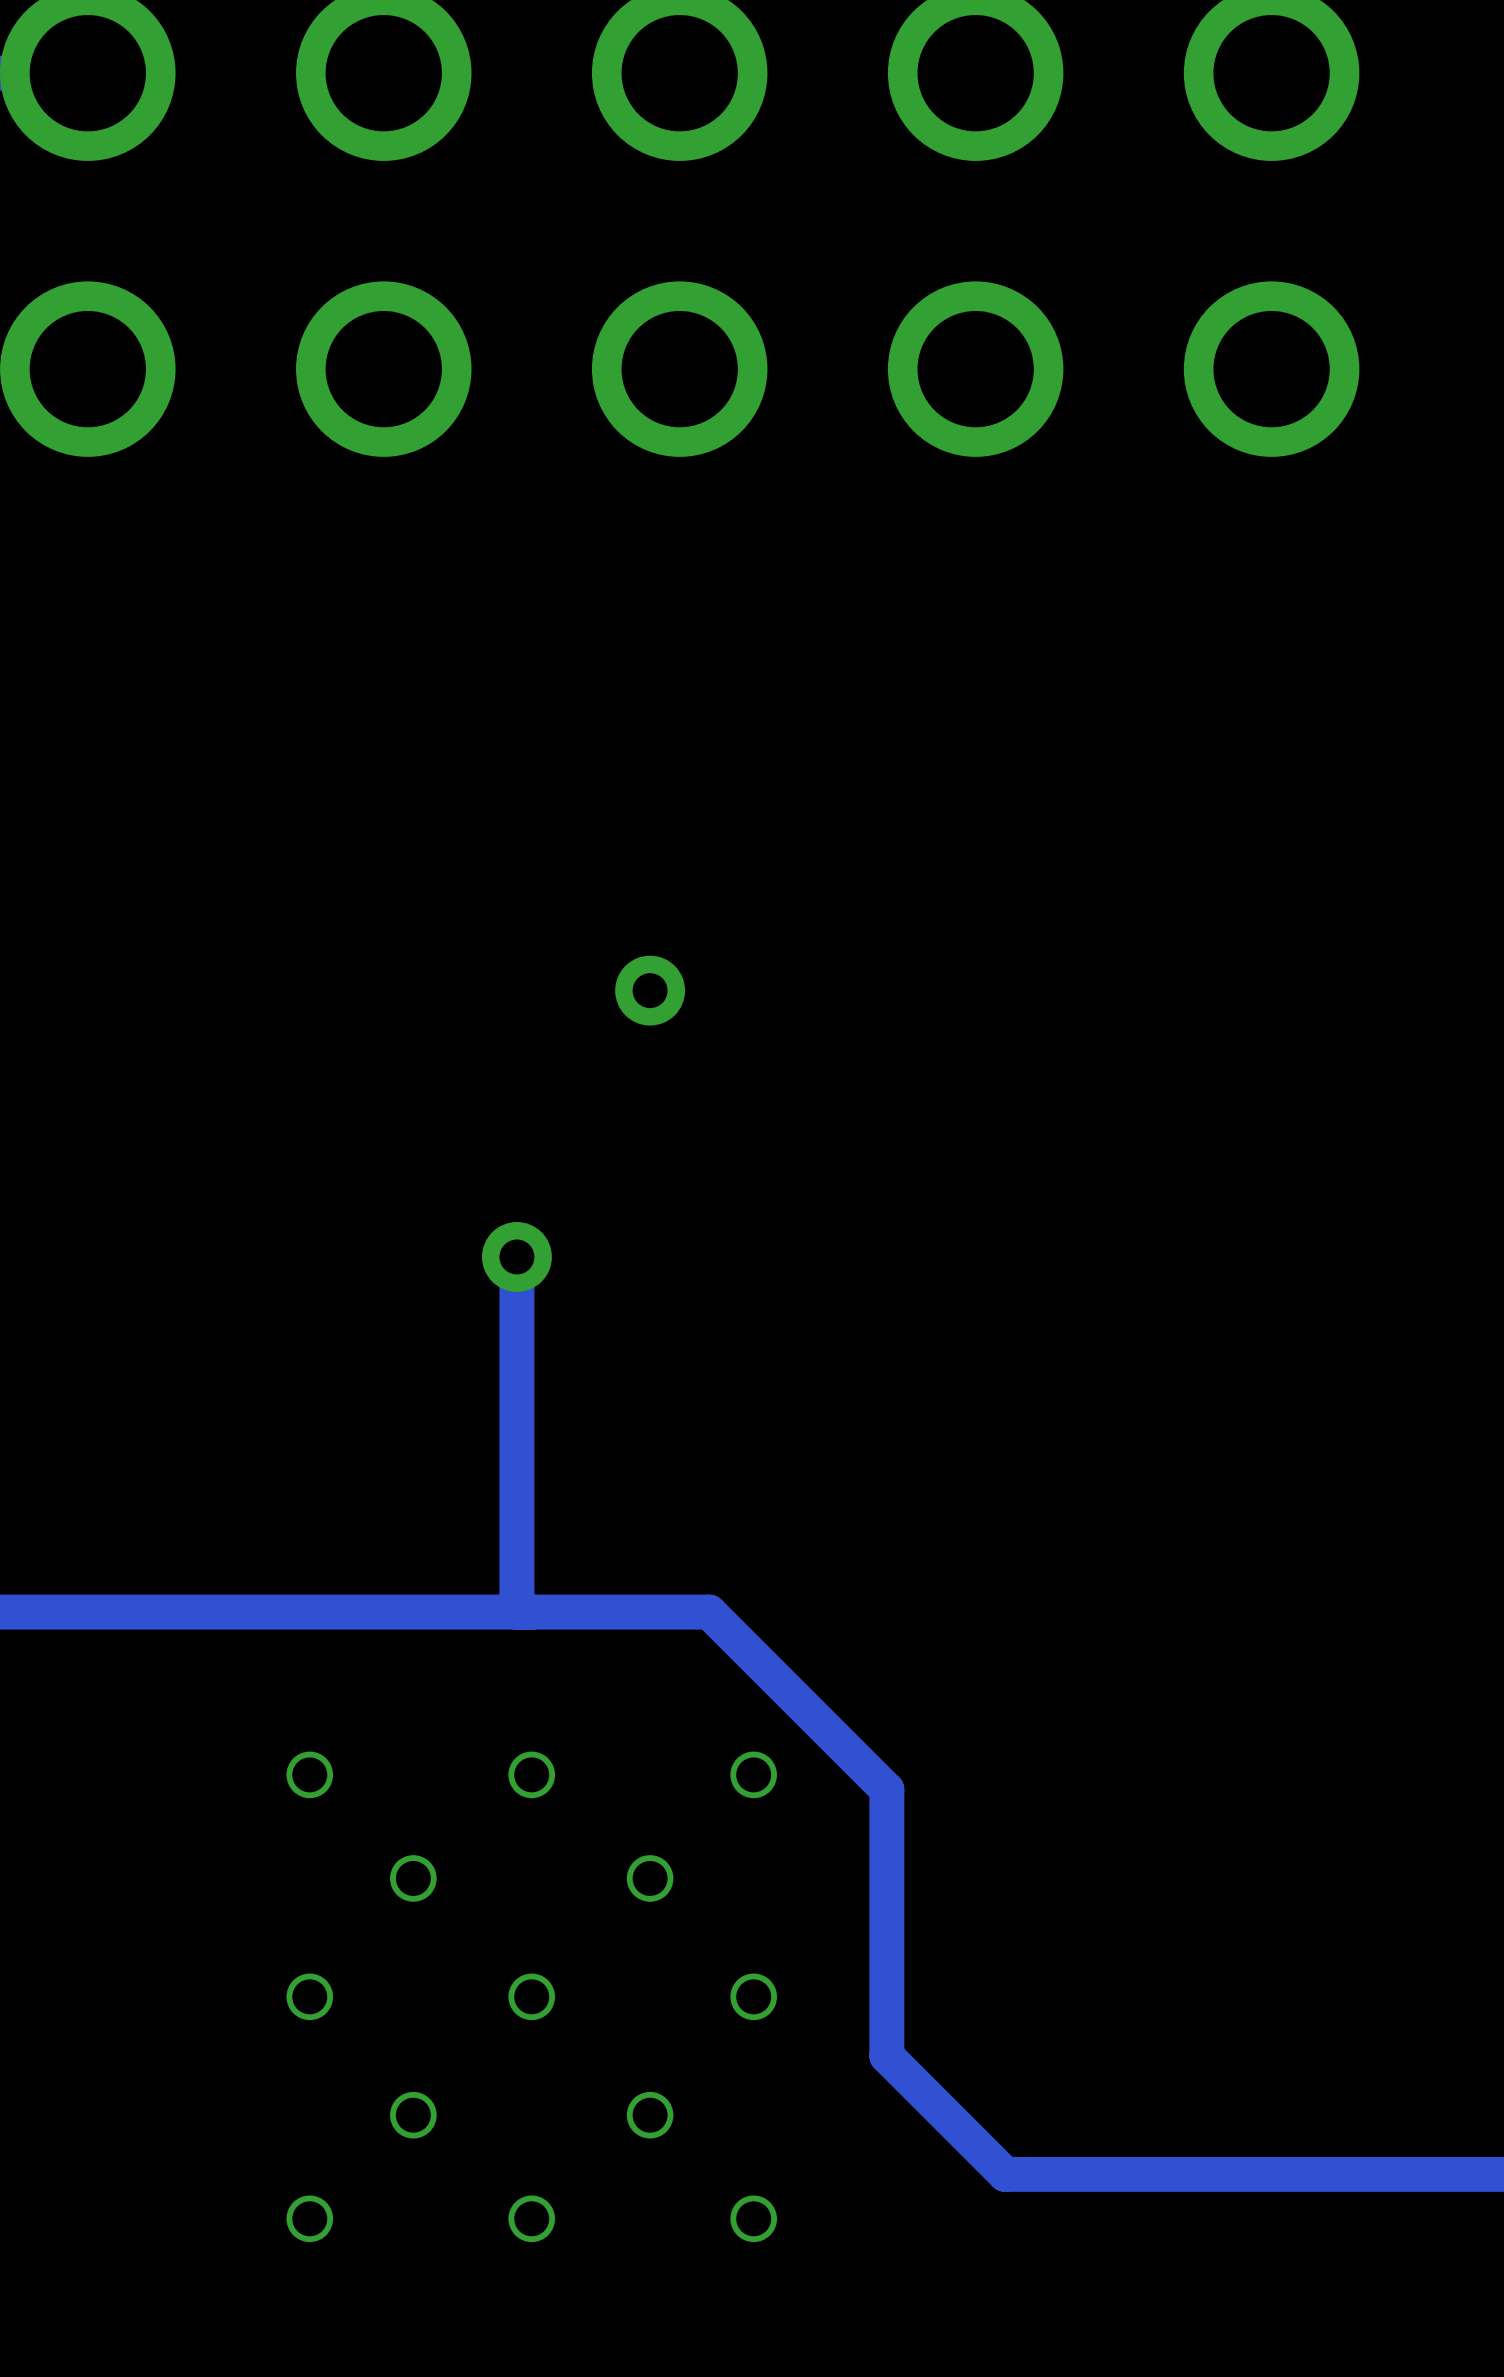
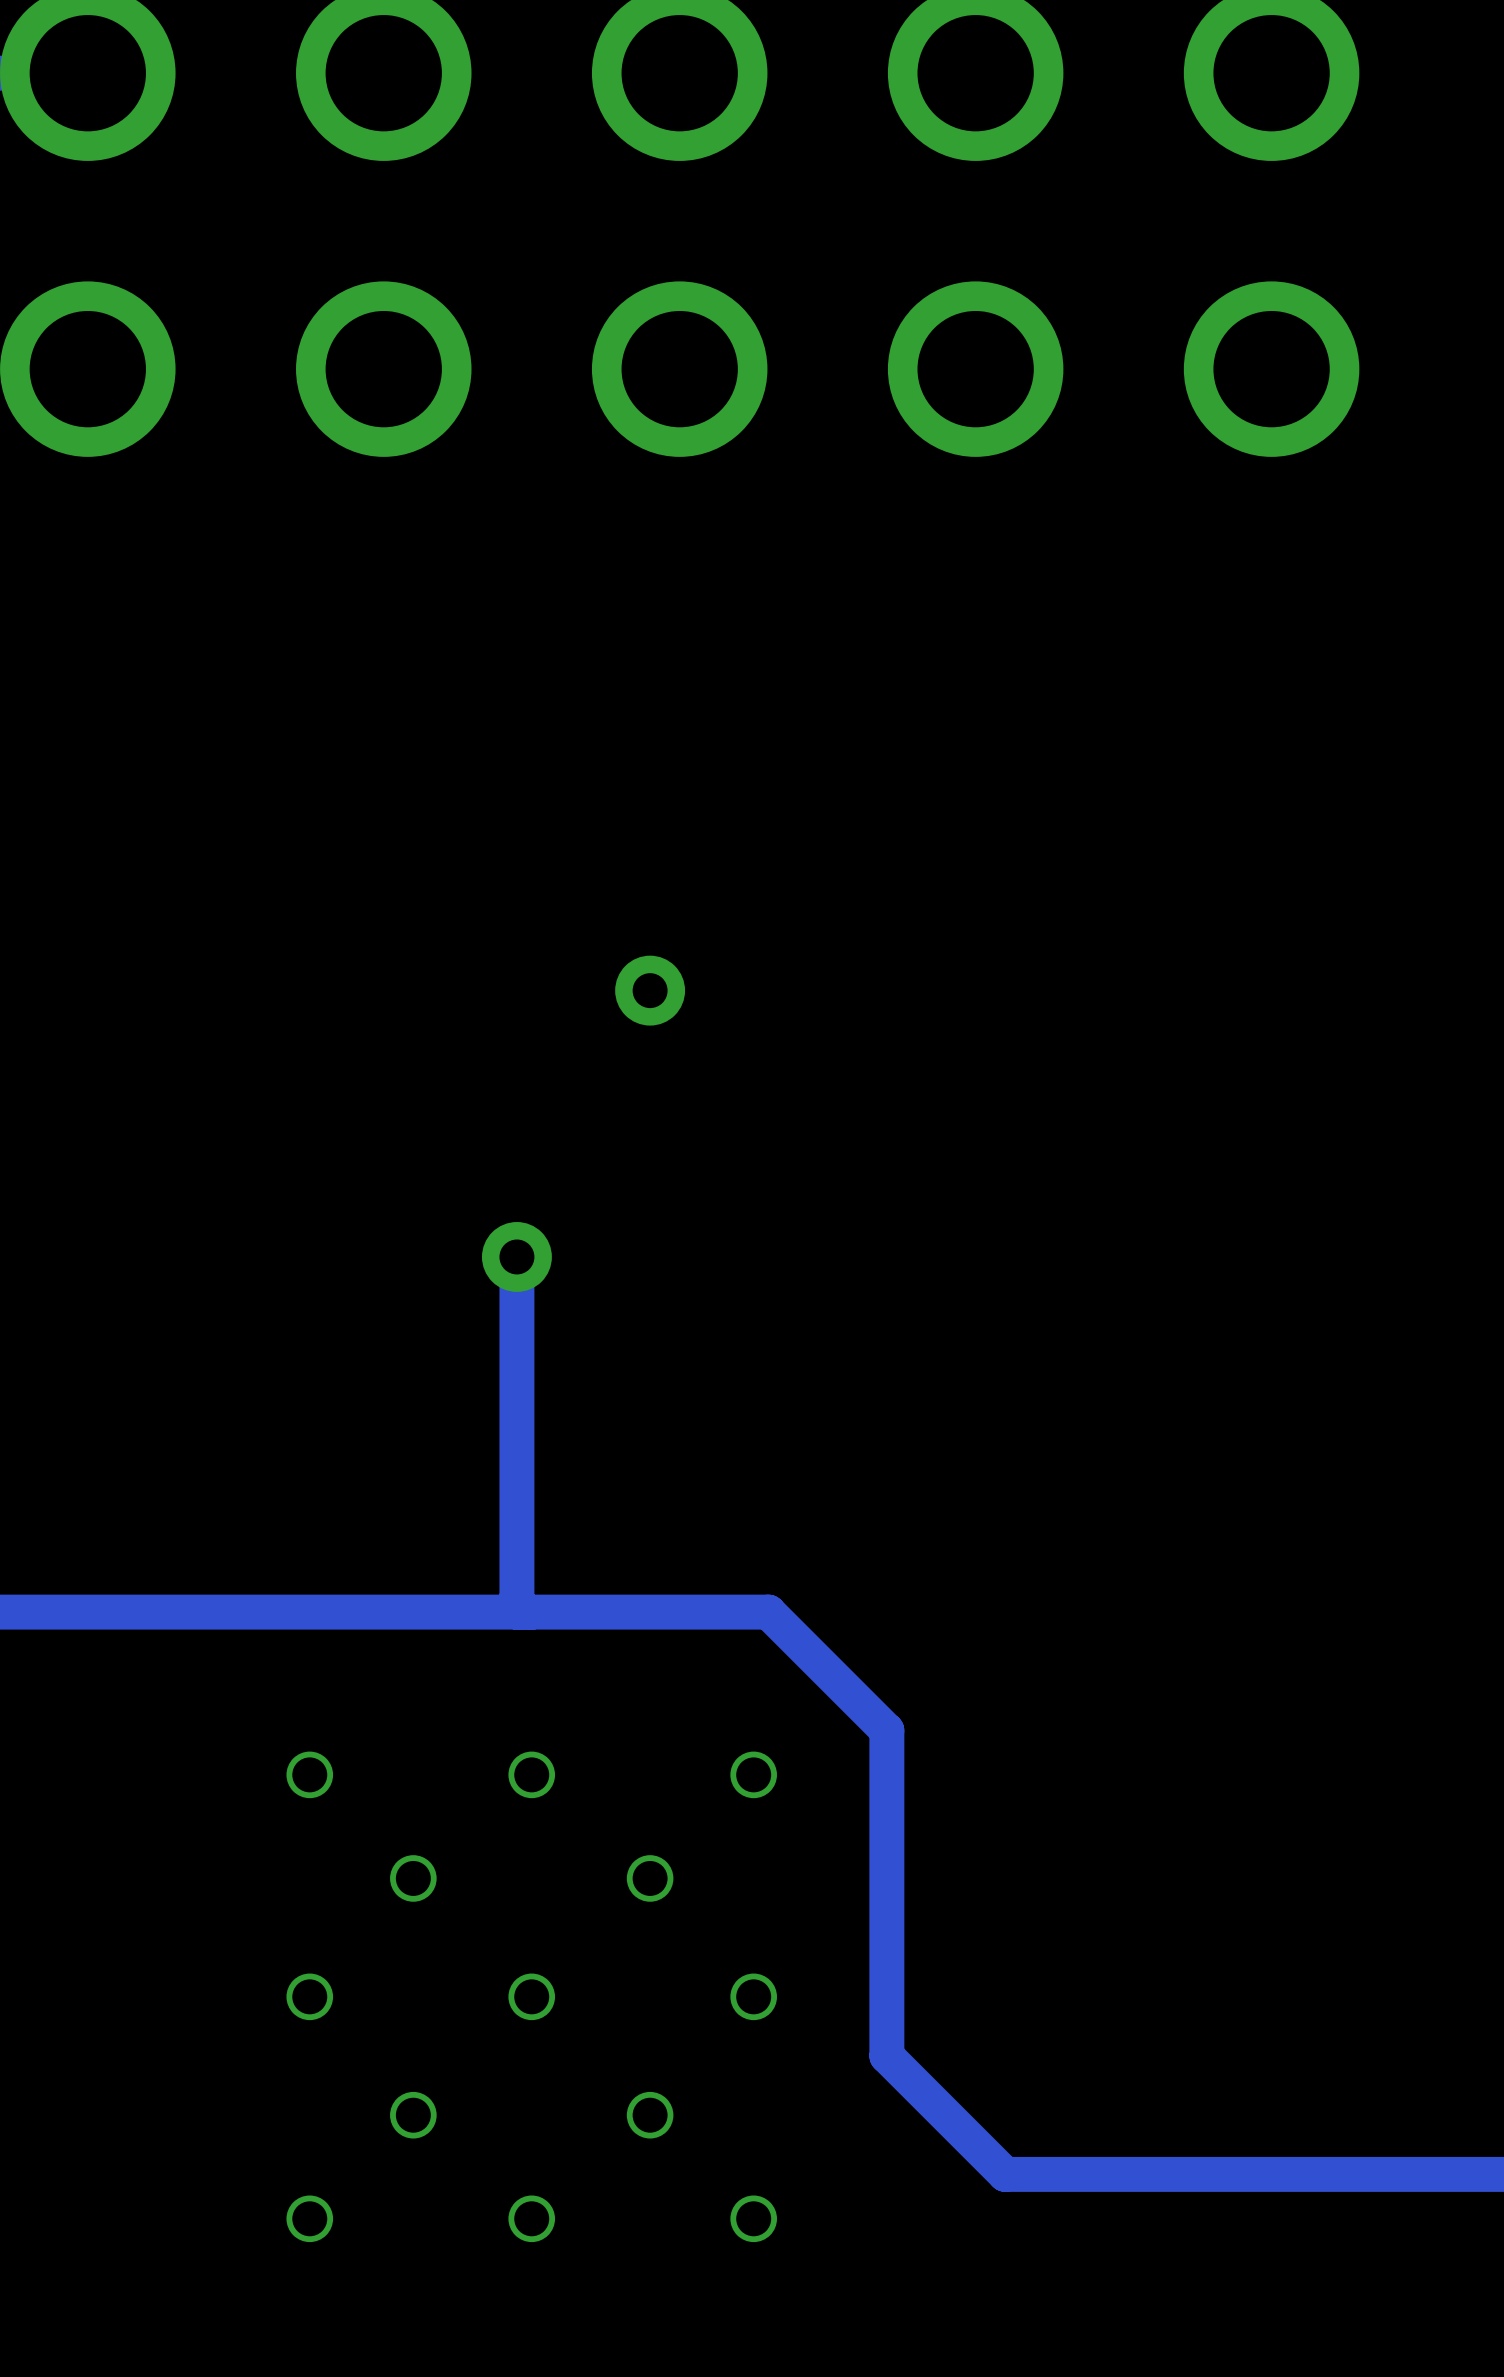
track: (709, 1612) (886, 1789) -> (709, 1612) (768, 1612) (886, 1730) (886, 1789)

